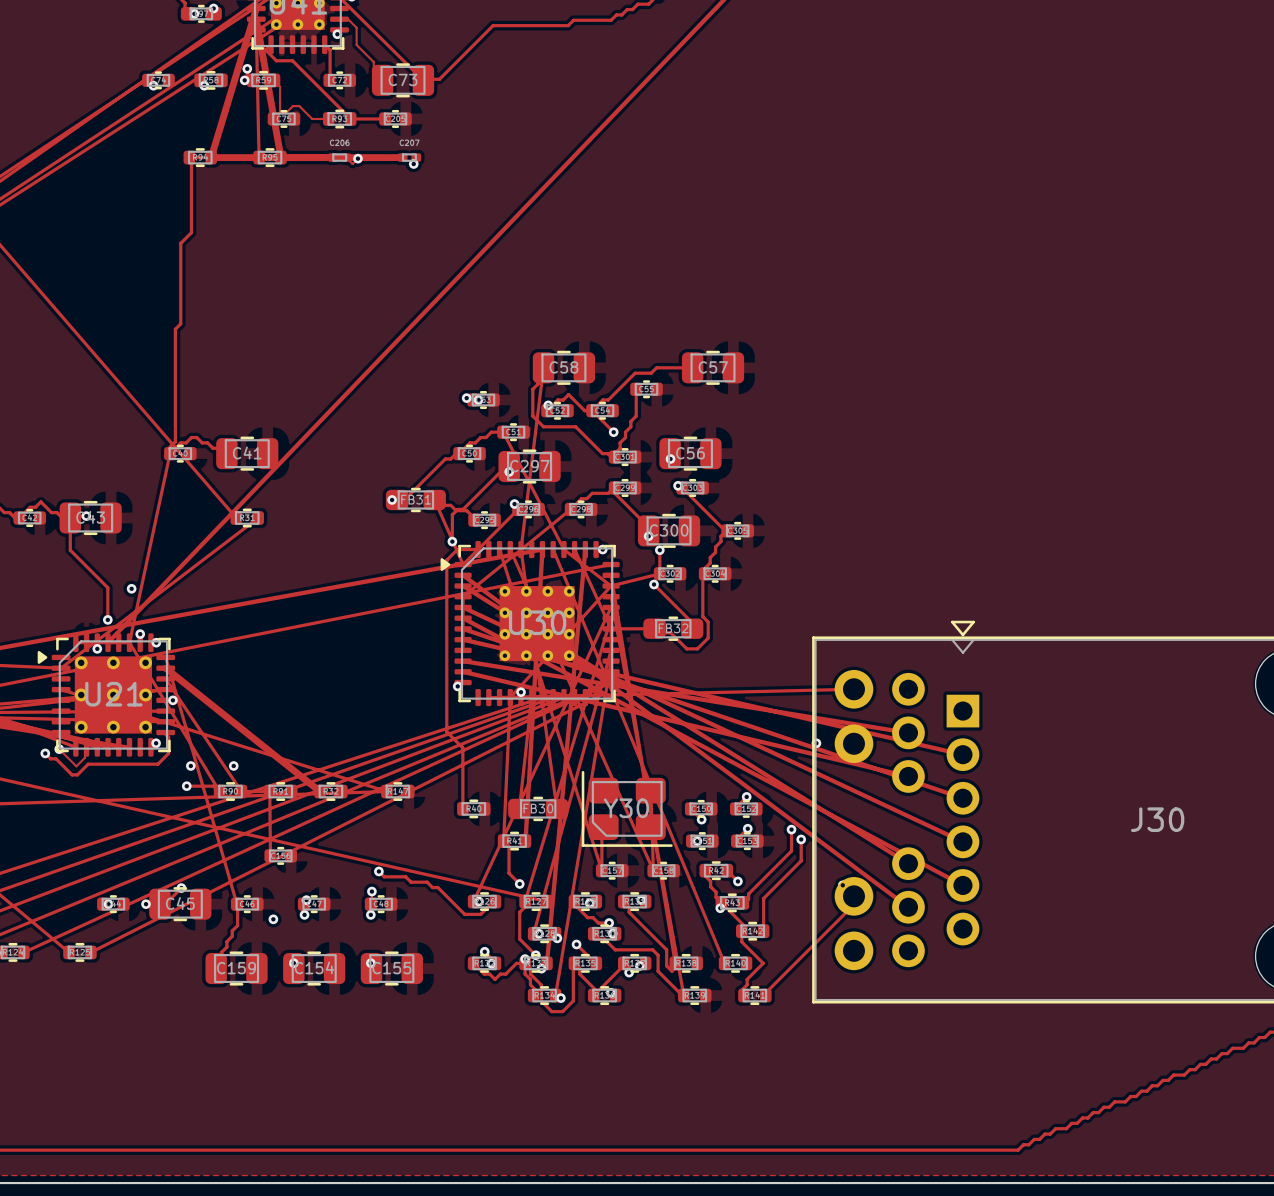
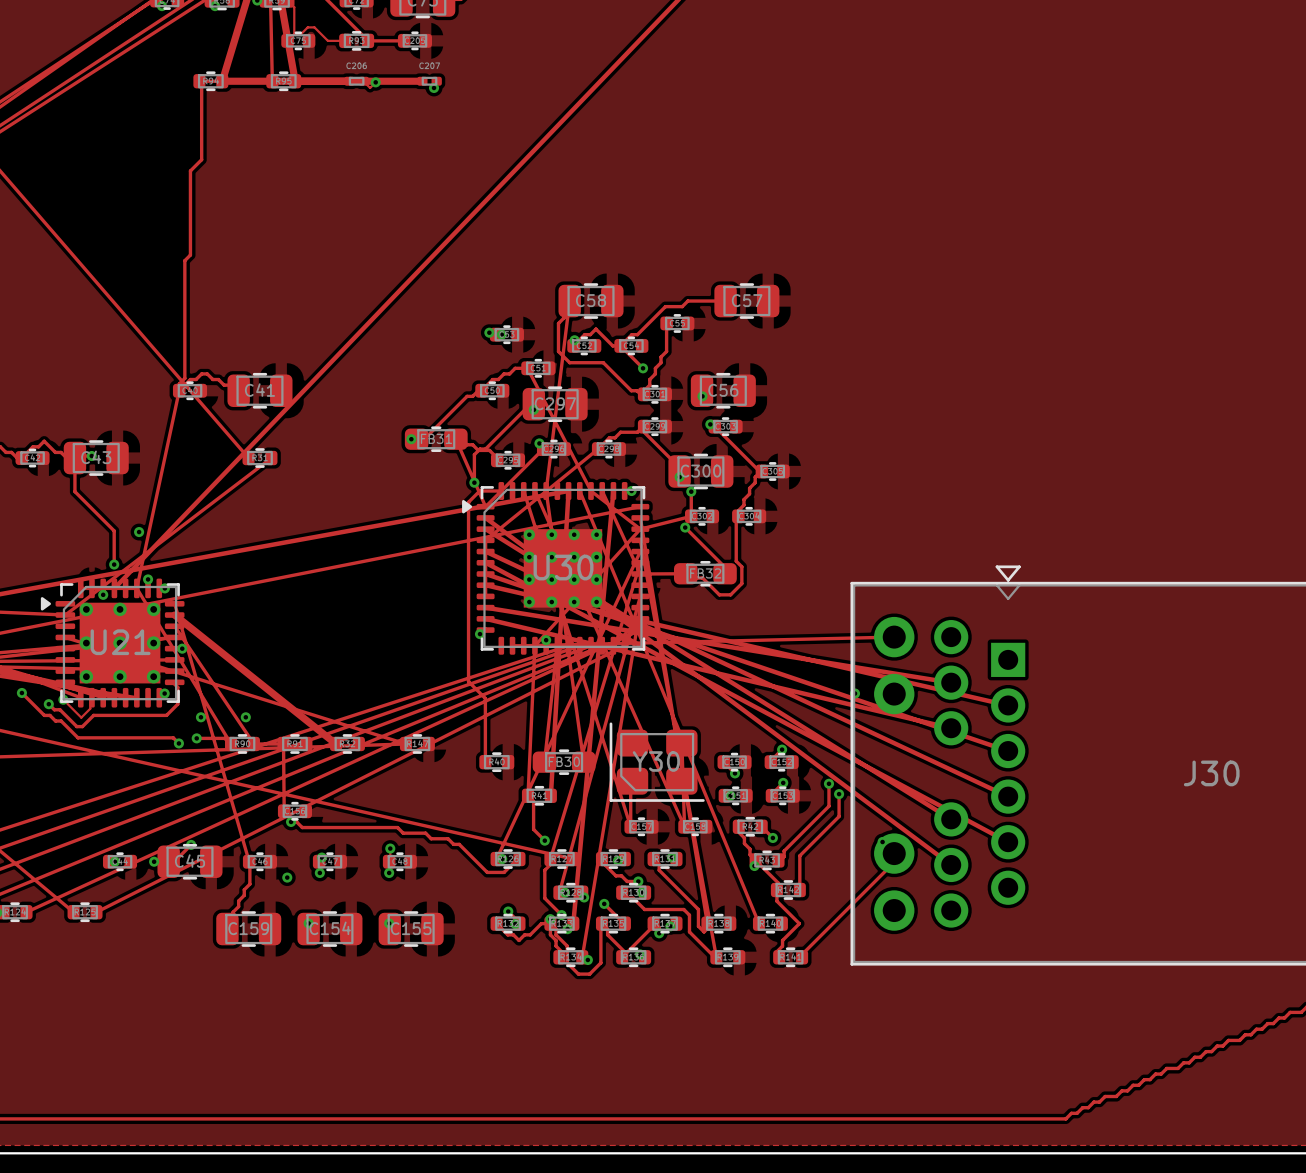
track: none -> (21, 692) (44, 715) (49, 715) (55, 721) (61, 721) (77, 737) (173, 737) (178, 743)
via: none -> (21, 692)
via: none -> (178, 743)
track: none -> (291, 821) (296, 821) (302, 827) (397, 827)
via position: (378, 871) -> (291, 821)

